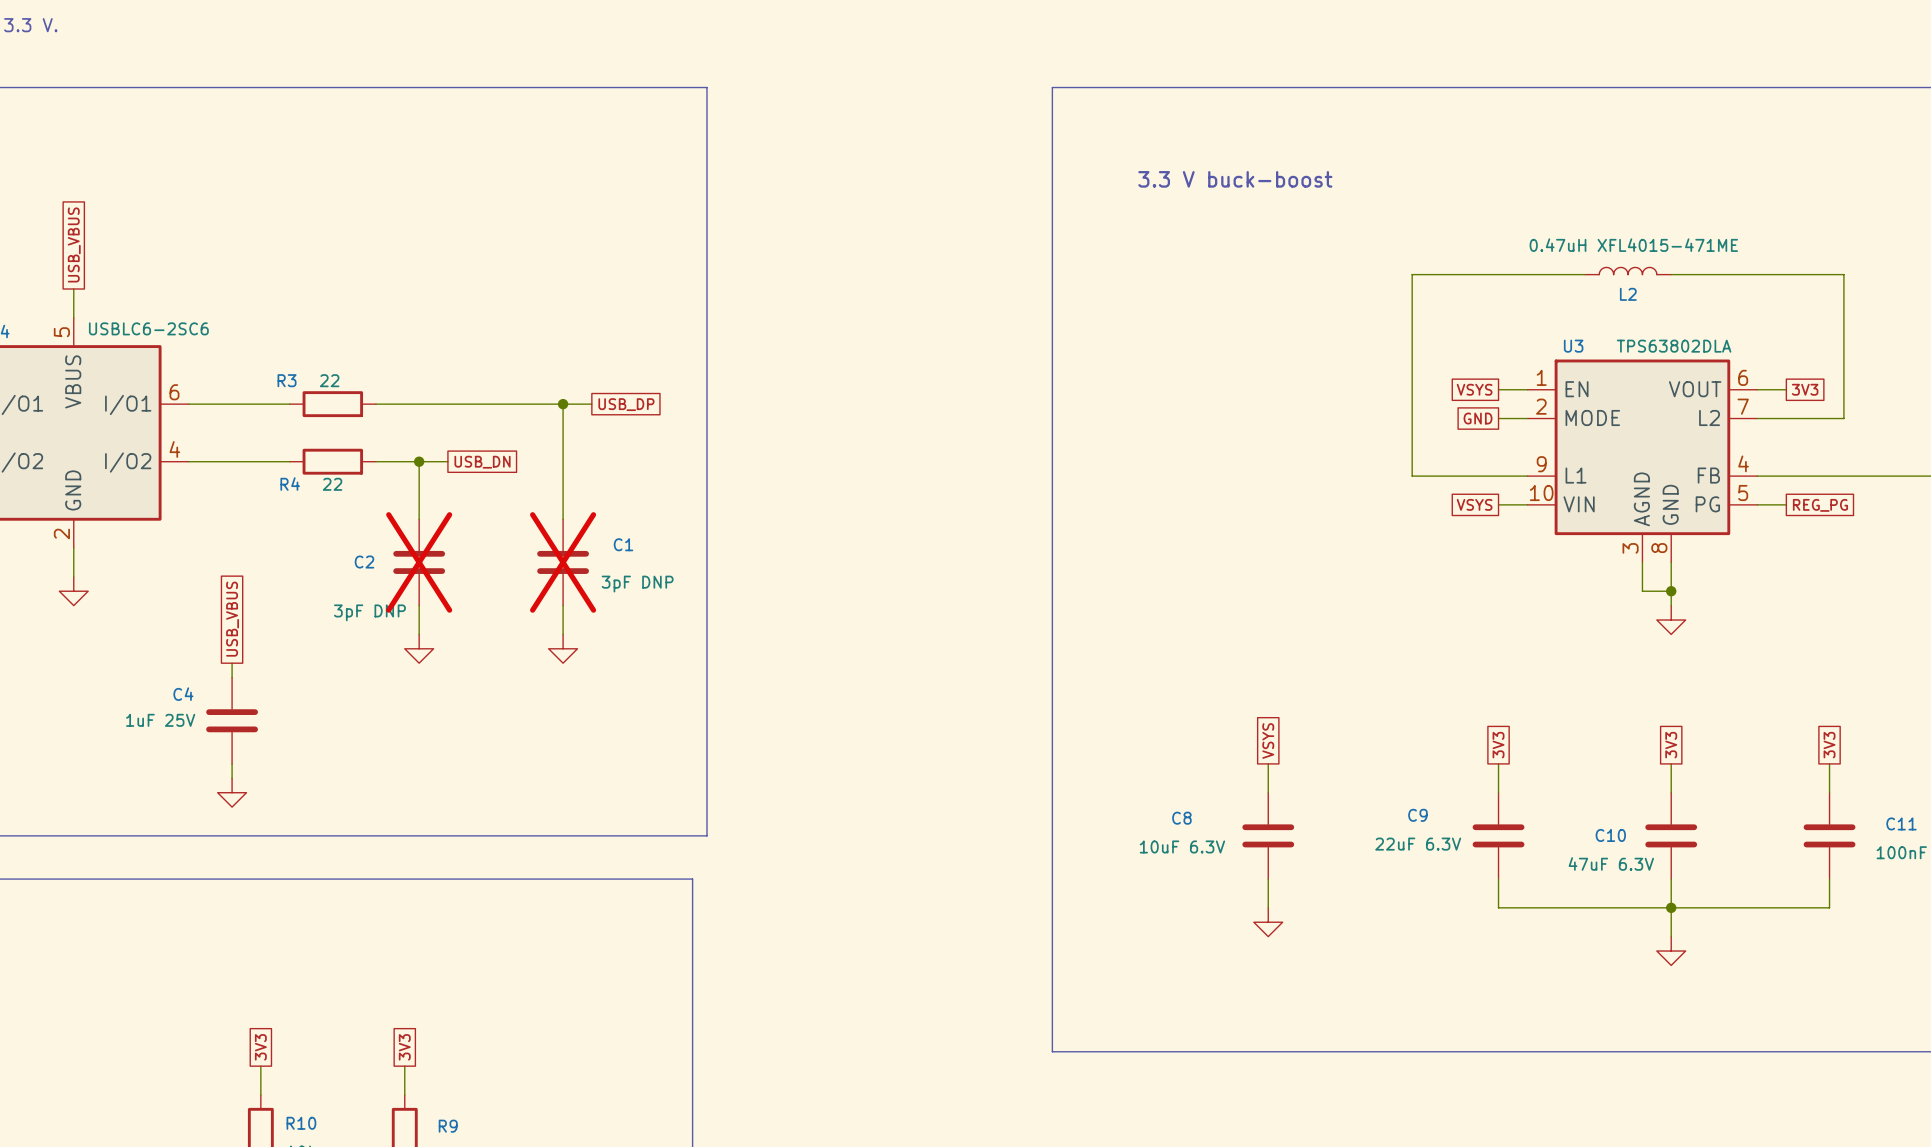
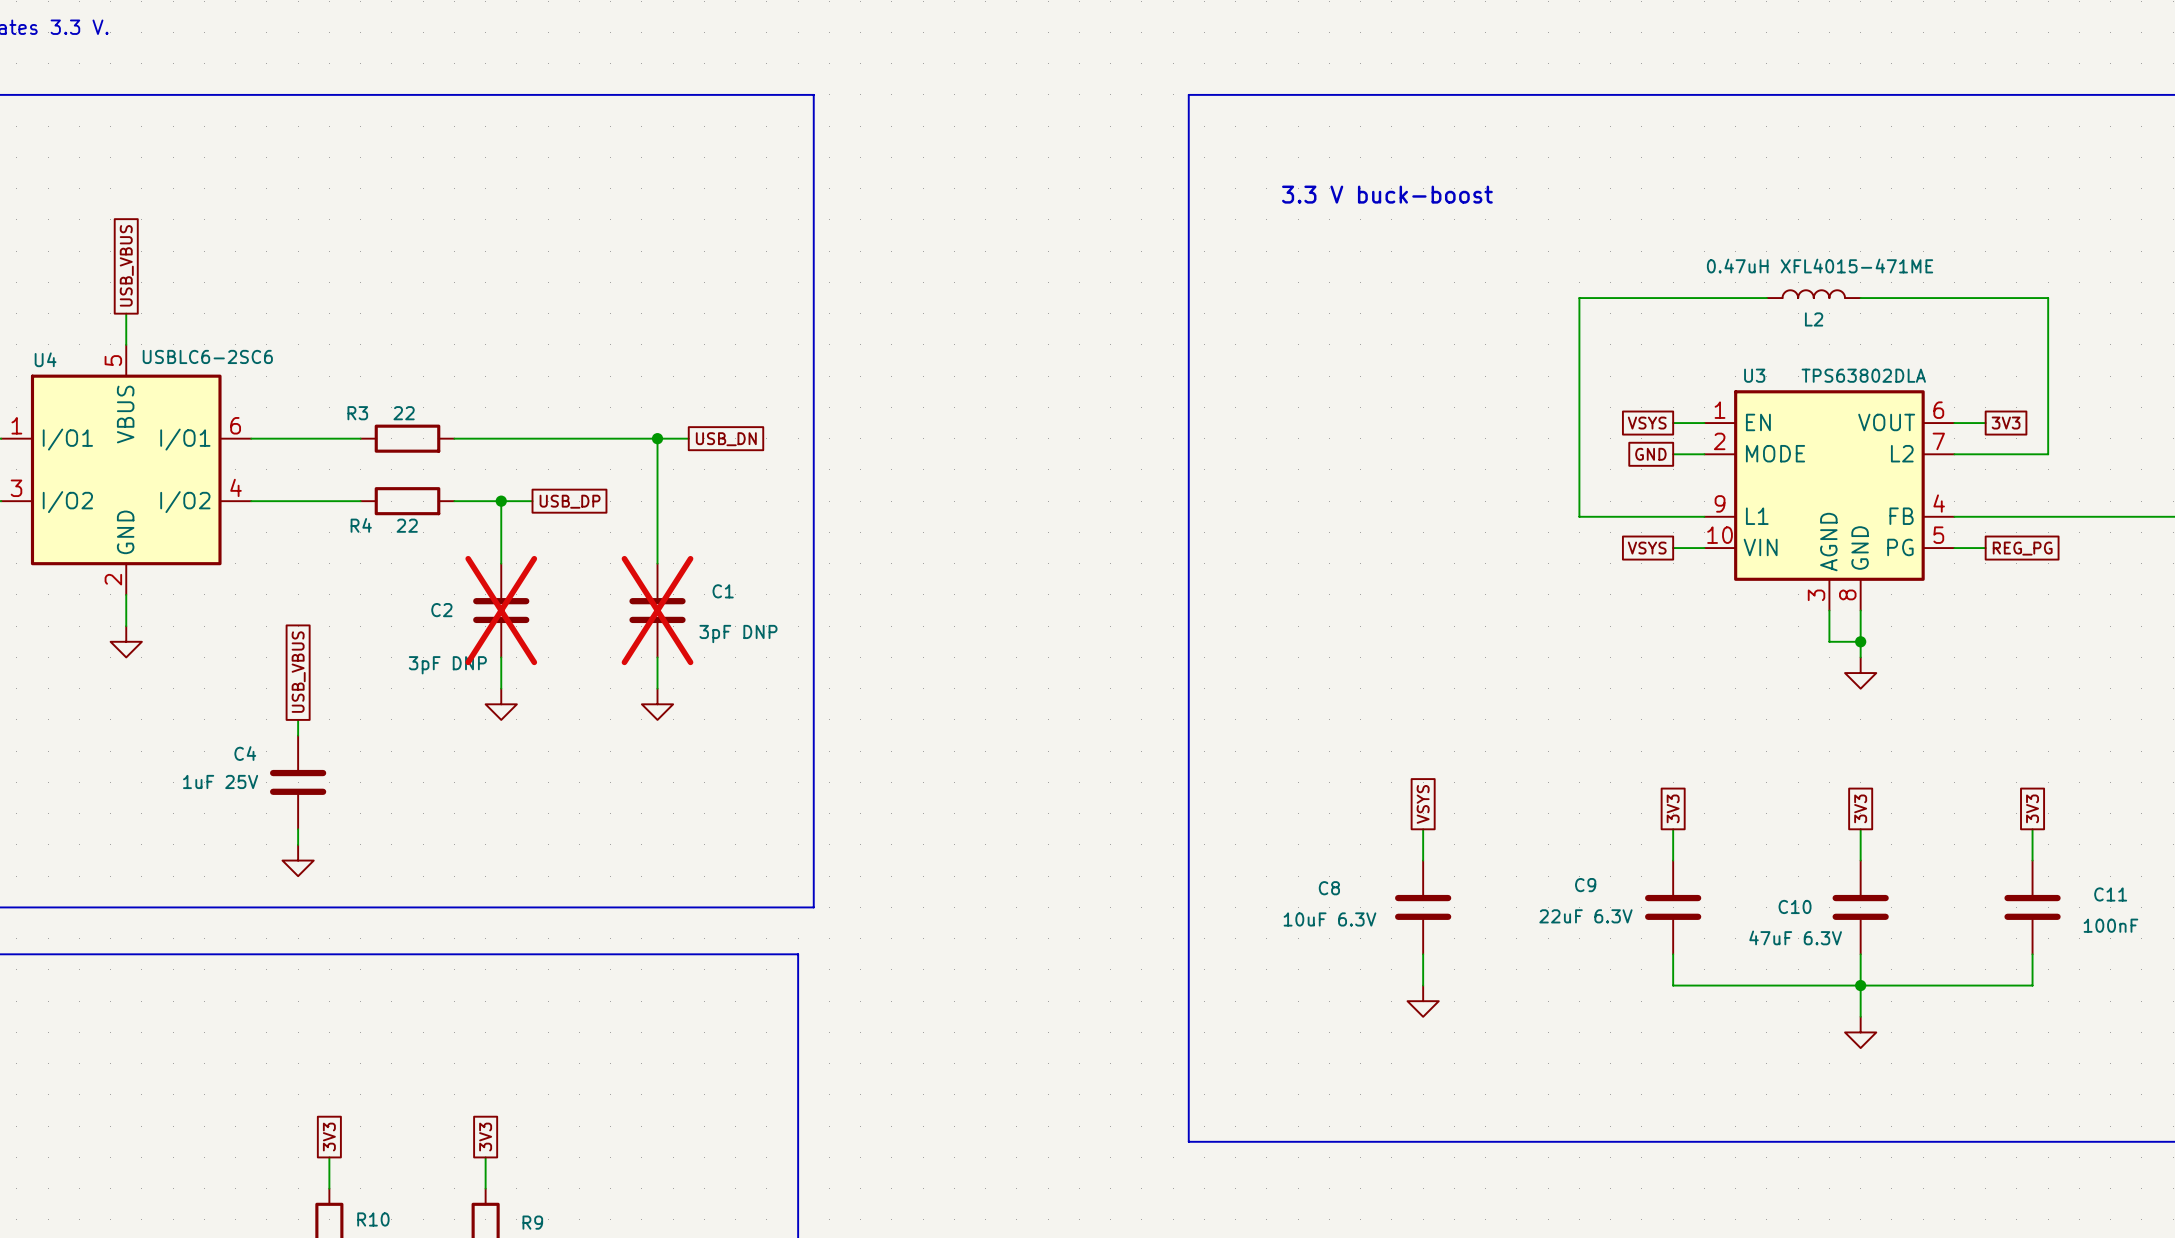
global label: USB_DP (626, 404) -> USB_DN (726, 439)
global label: USB_DN (482, 462) -> USB_DP (570, 501)

